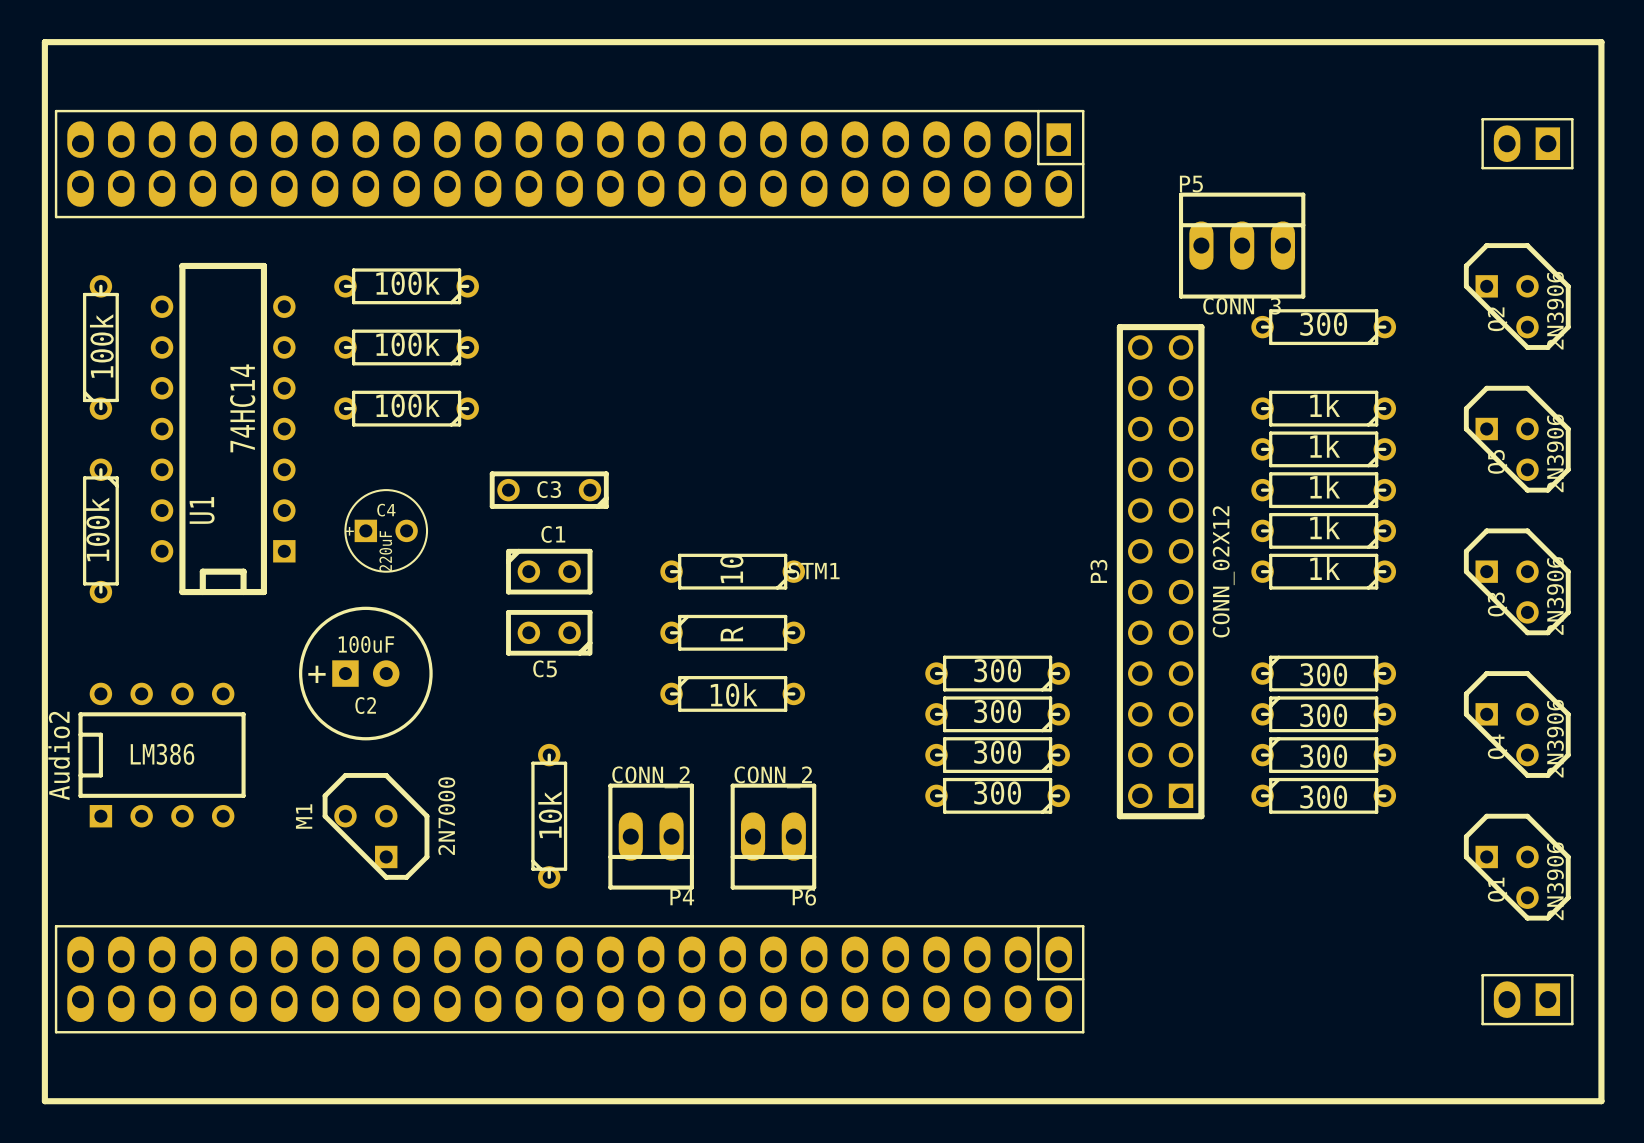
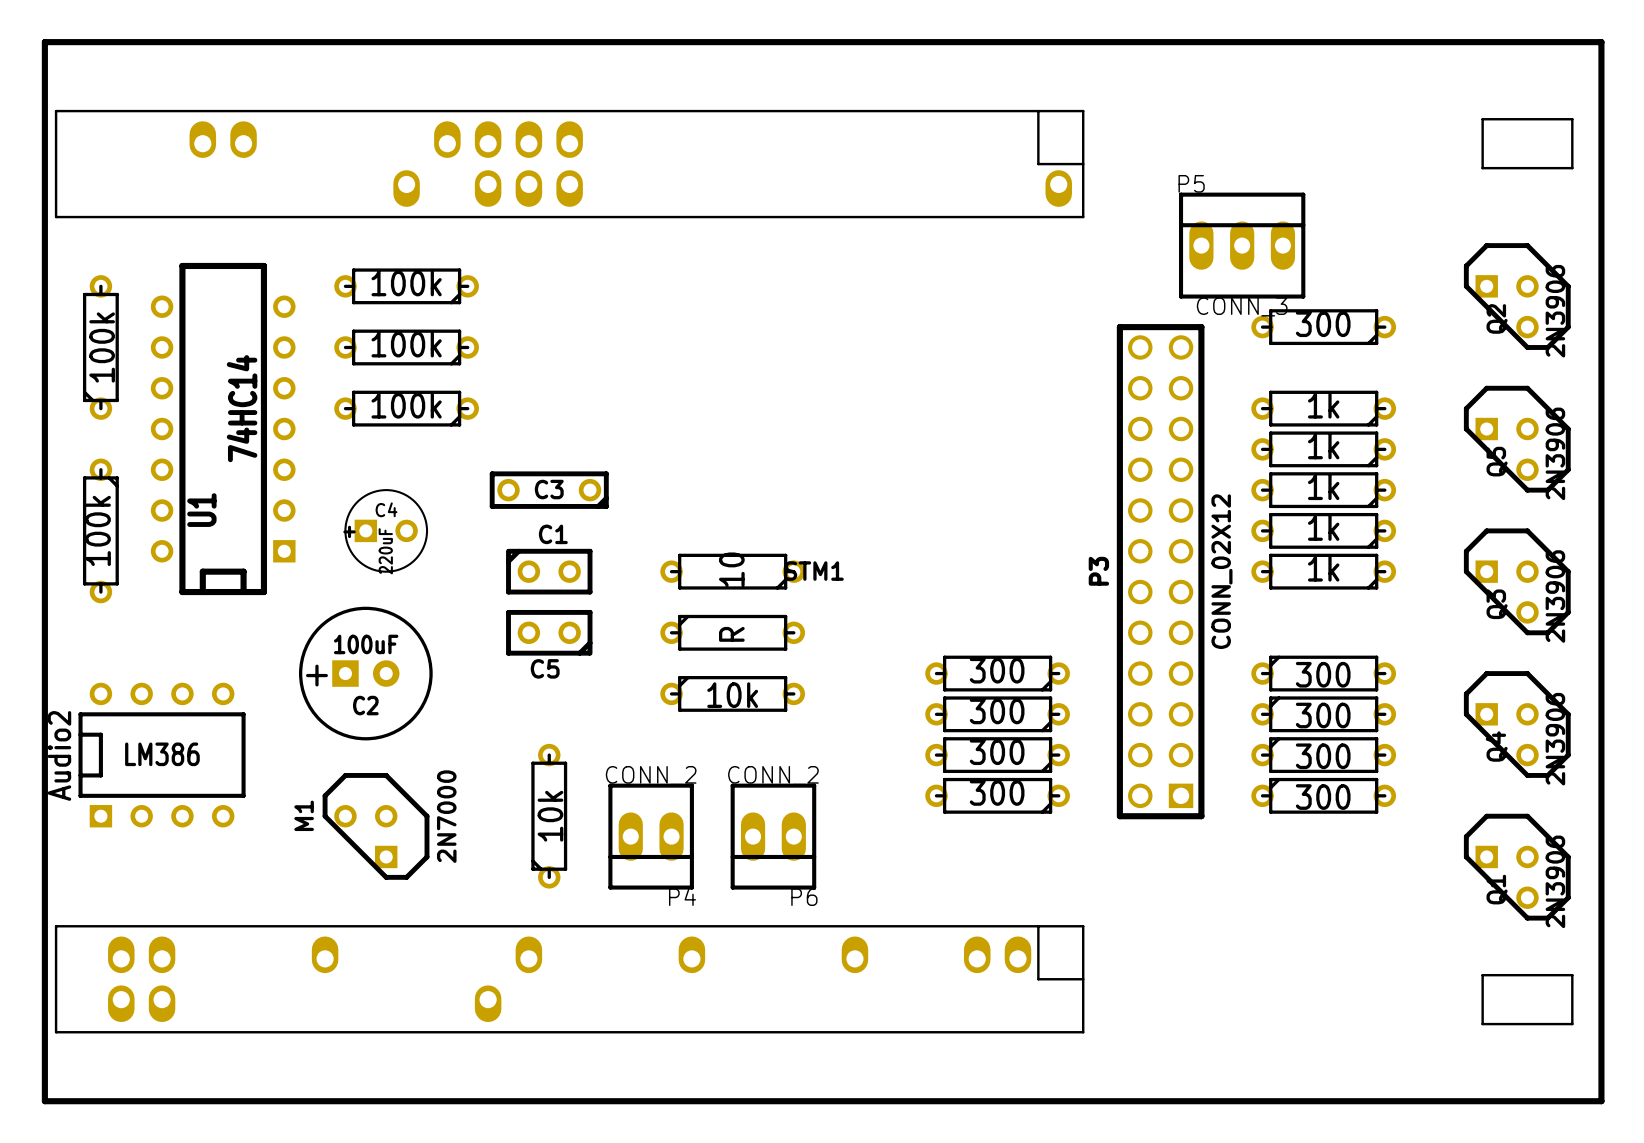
STM1 footprint: [41, 39, 1605, 1105] -> [41, 39, 1605, 1105]

